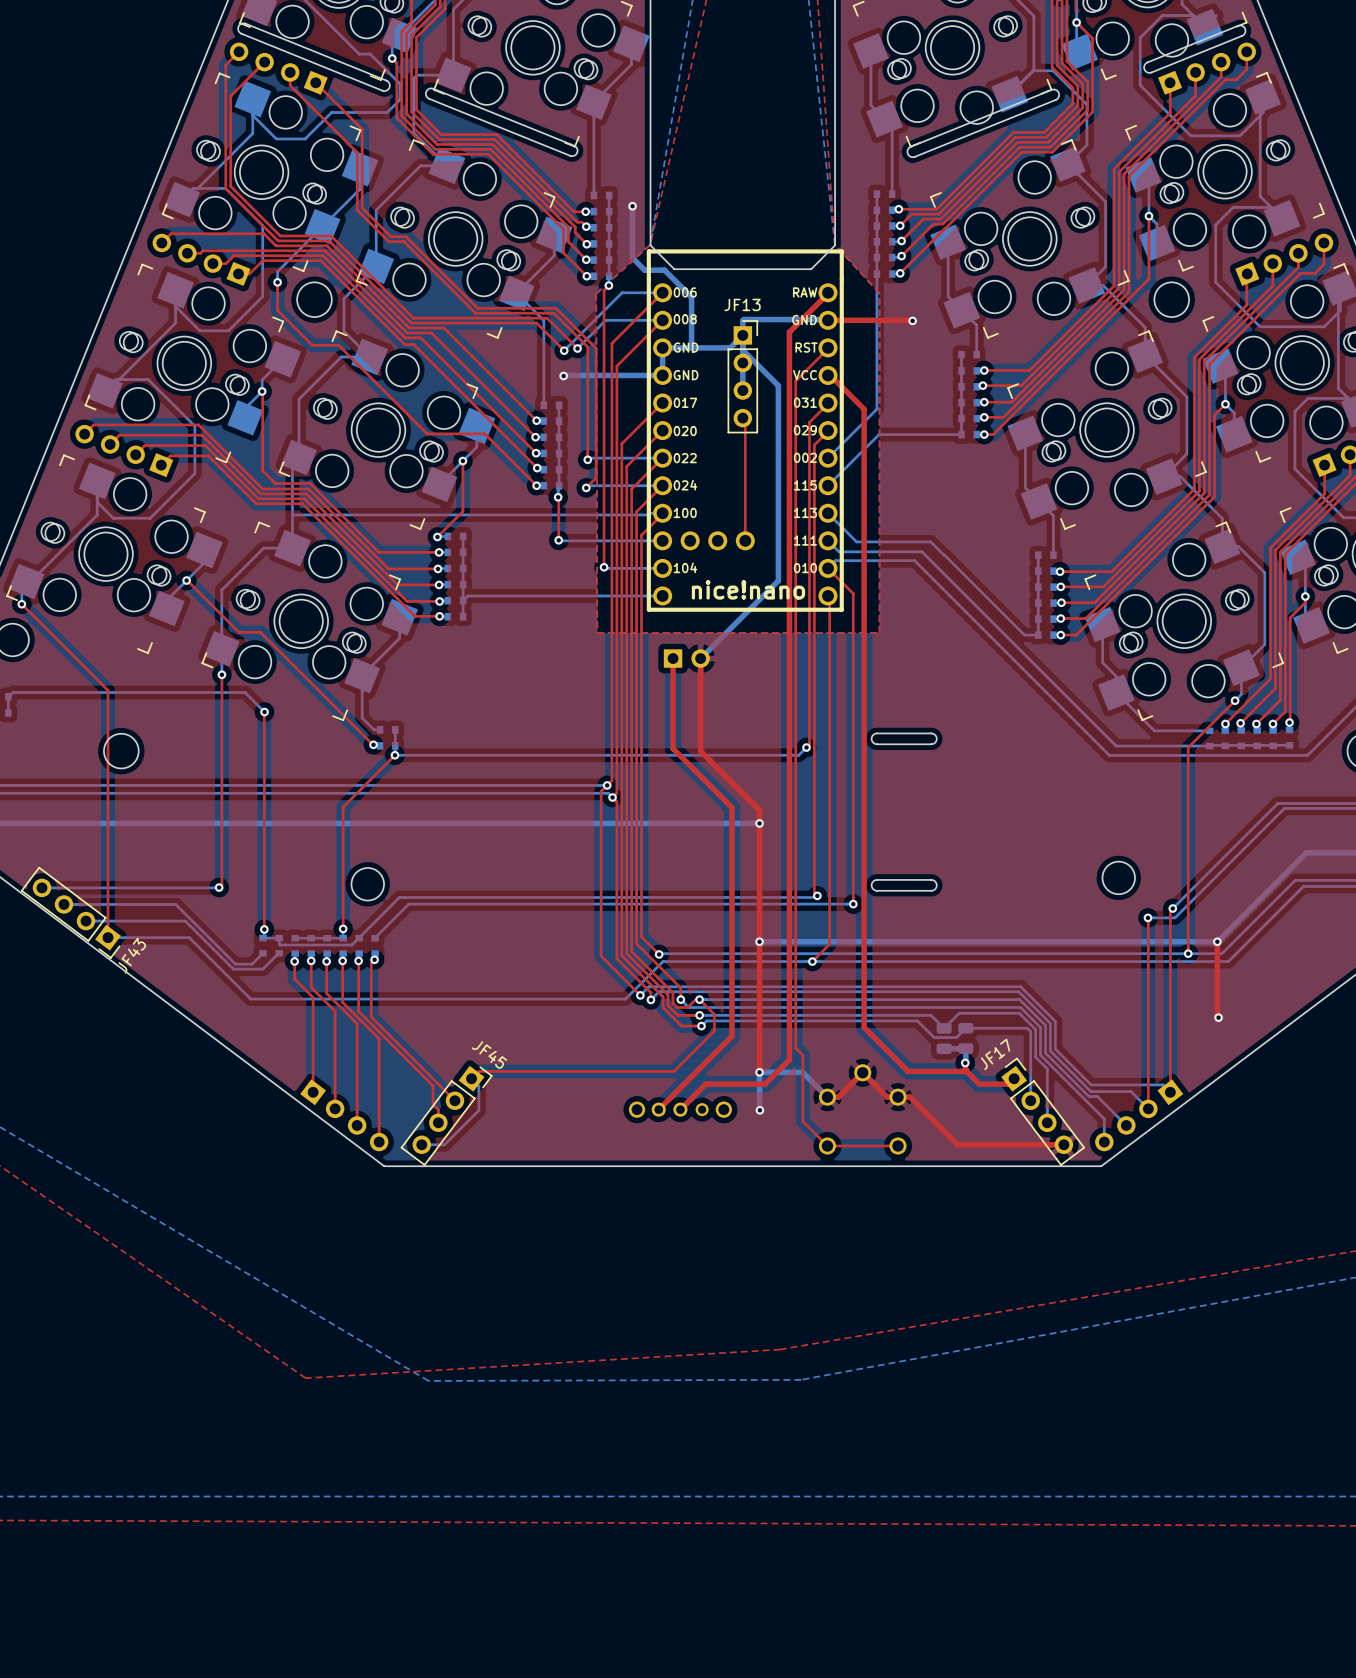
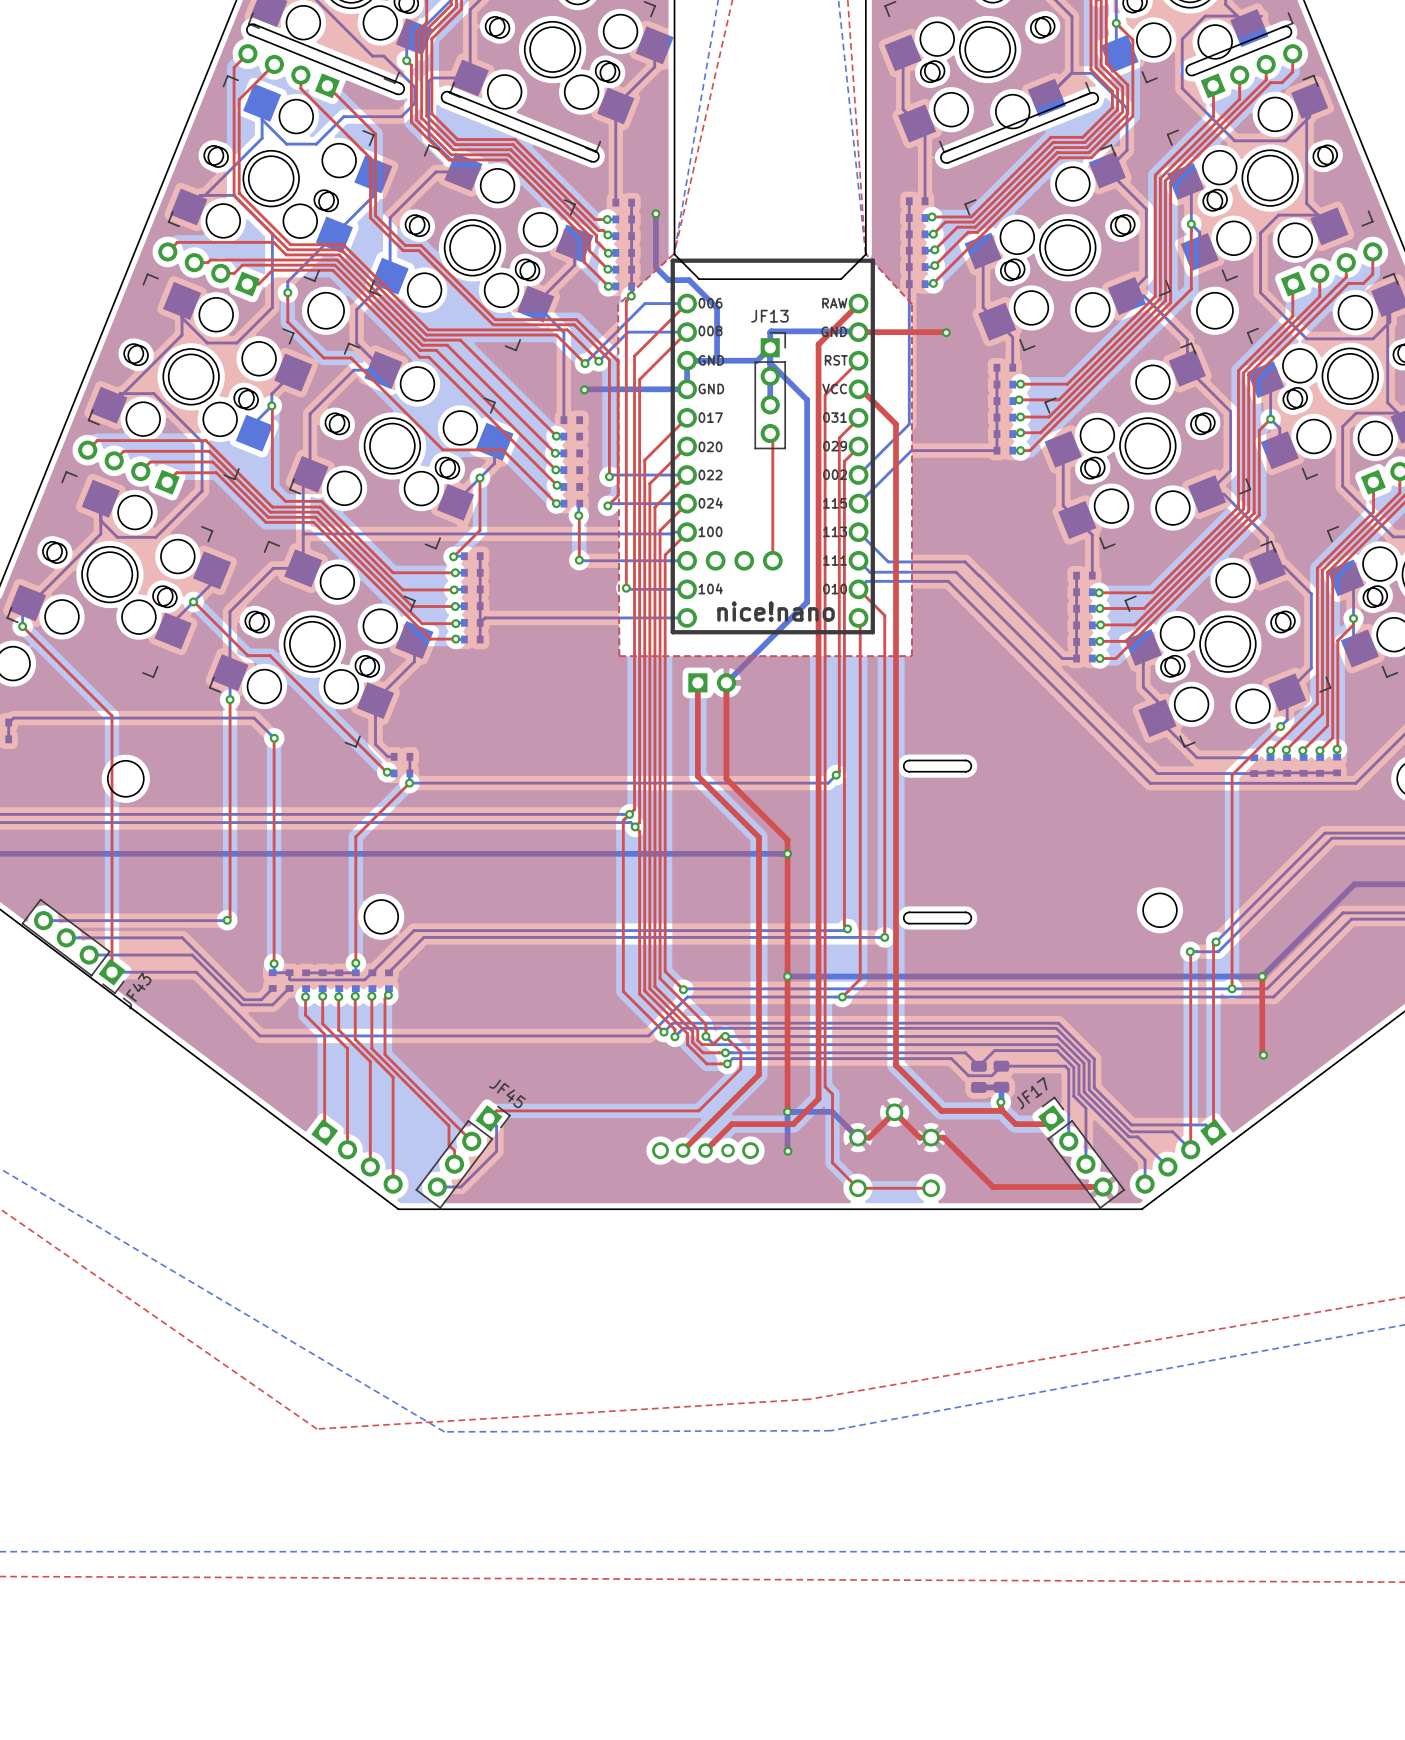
bottom track: (559, 405) (558, 490) -> none

